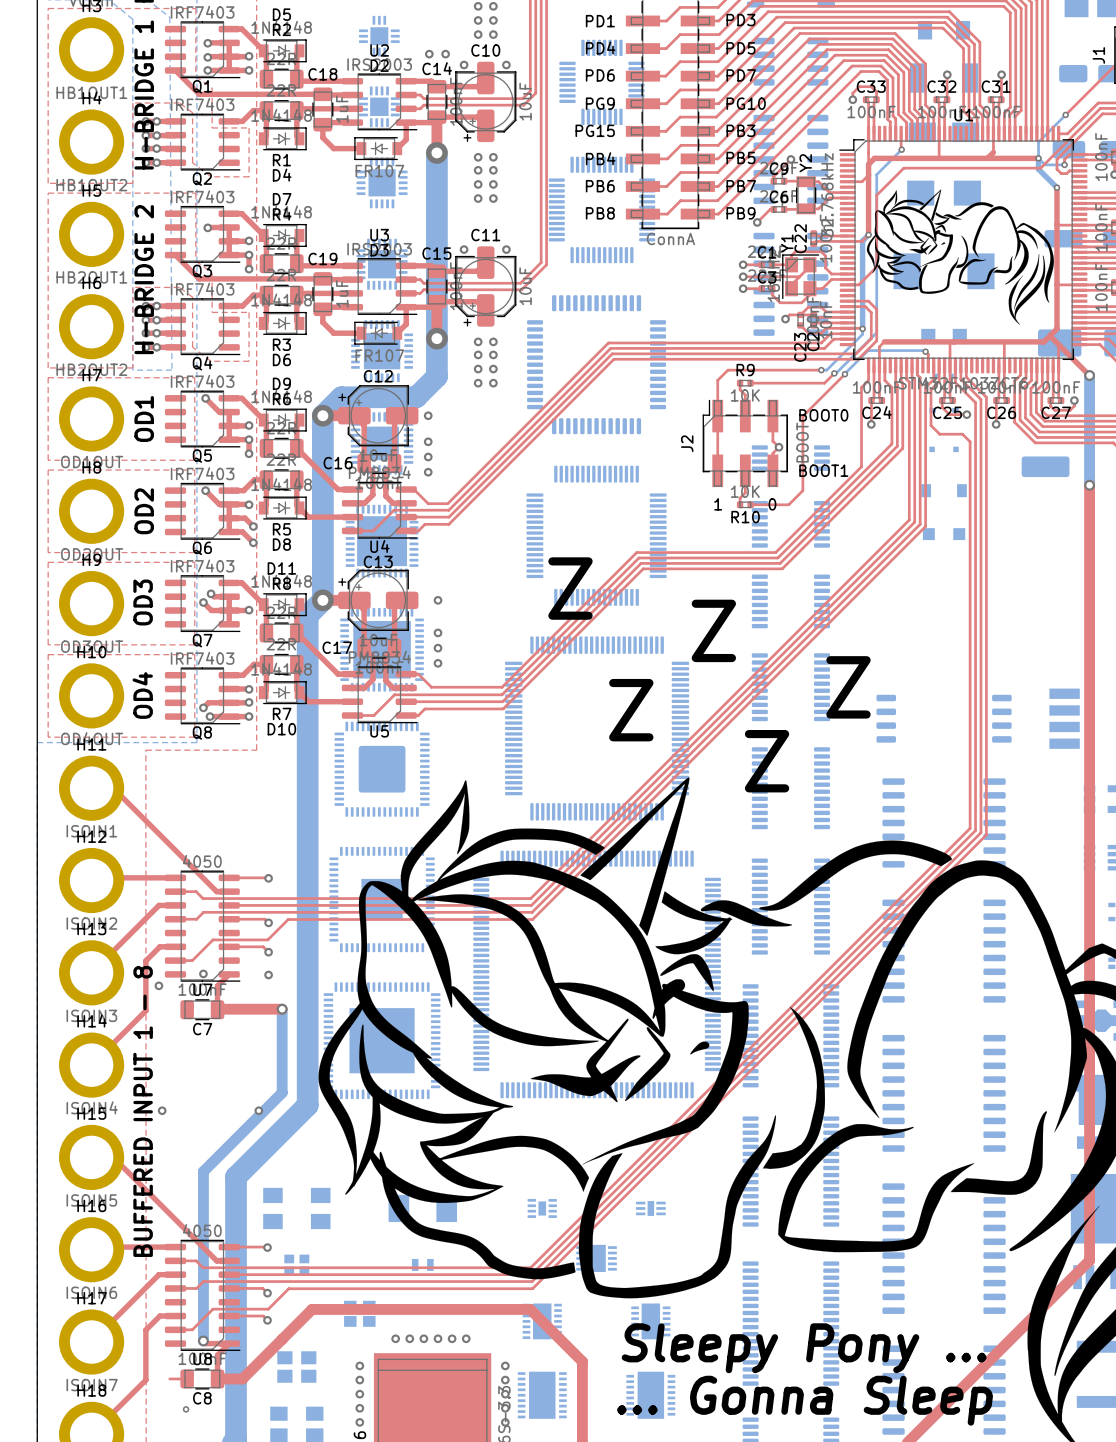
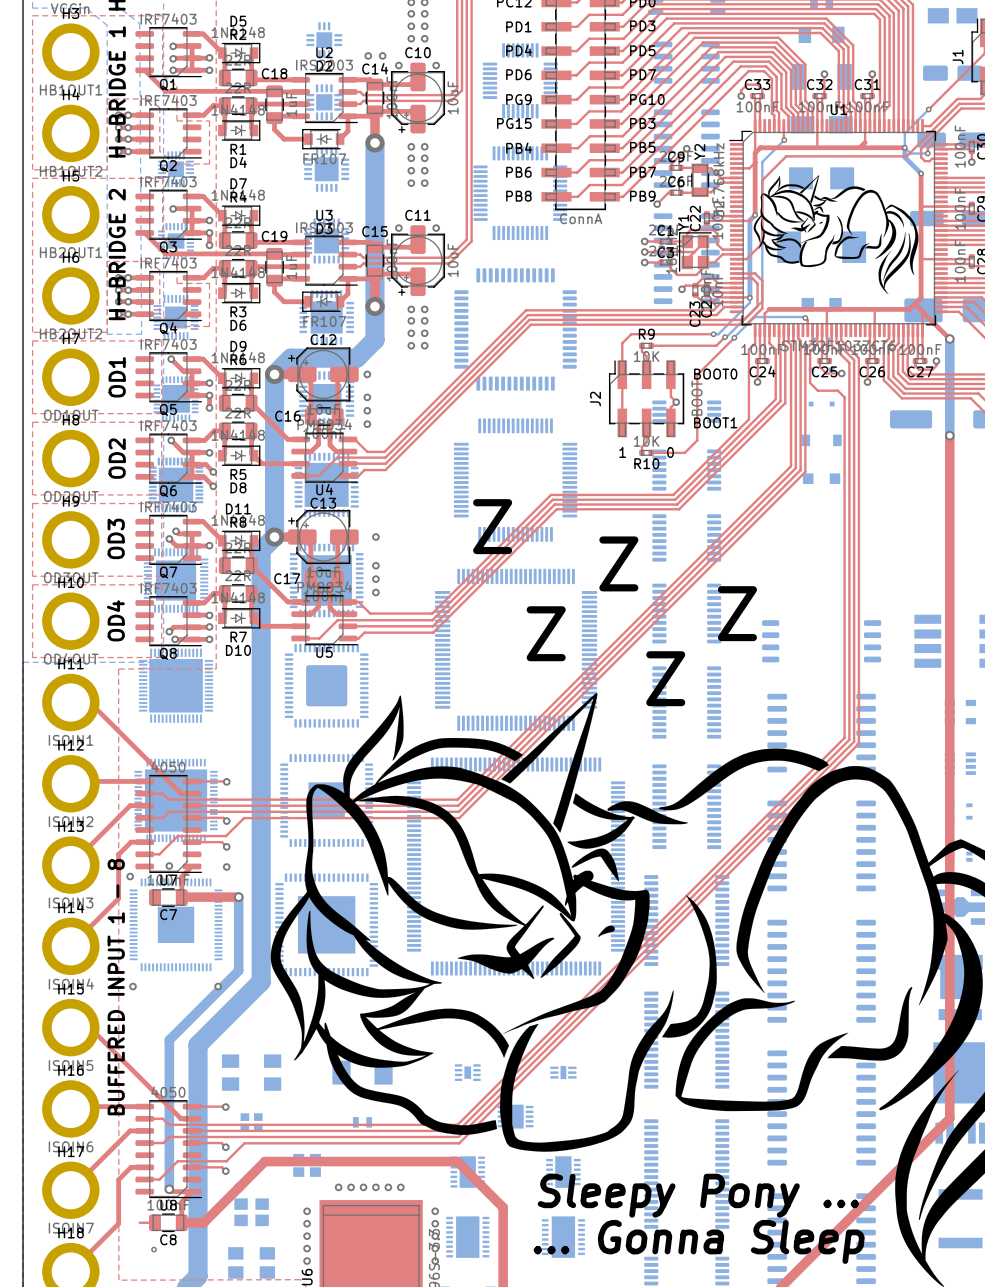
part: none -> (176, 169)
part: none -> (176, 241)
part: none -> (176, 317)
part: none -> (176, 398)
part: none -> (176, 484)
part: none -> (176, 580)
part: none -> (176, 685)
part: none -> (176, 800)
part: none -> (176, 924)

